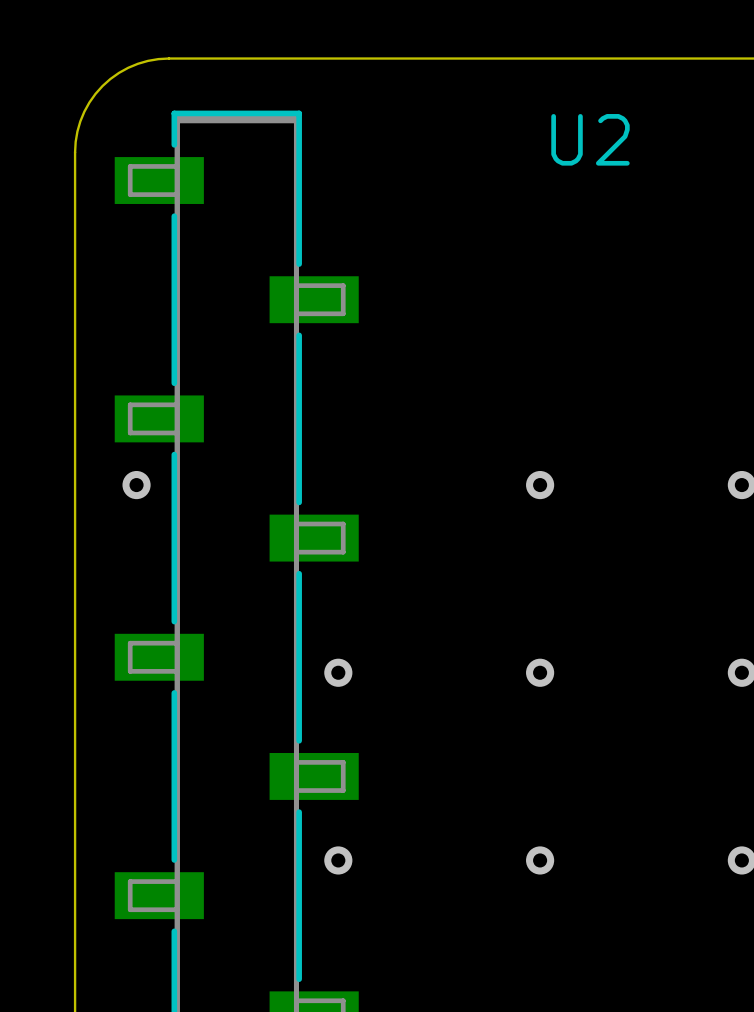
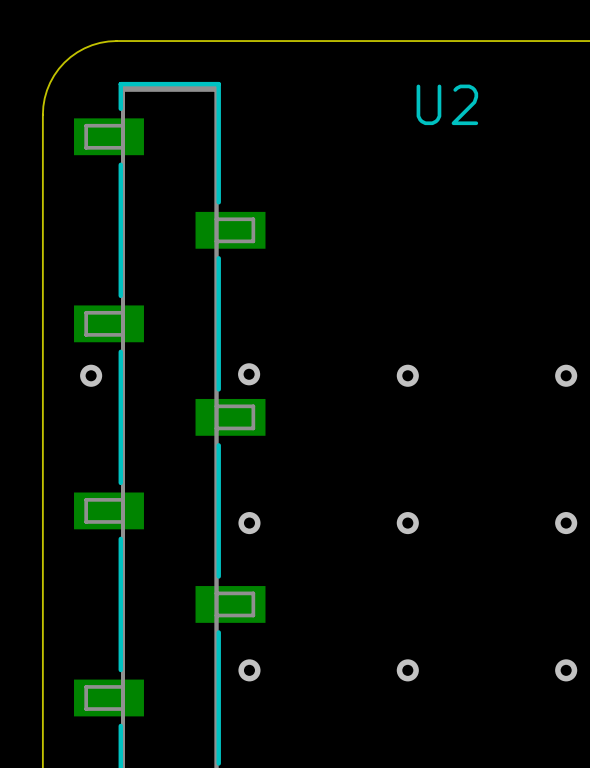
via: none -> (249, 374)

